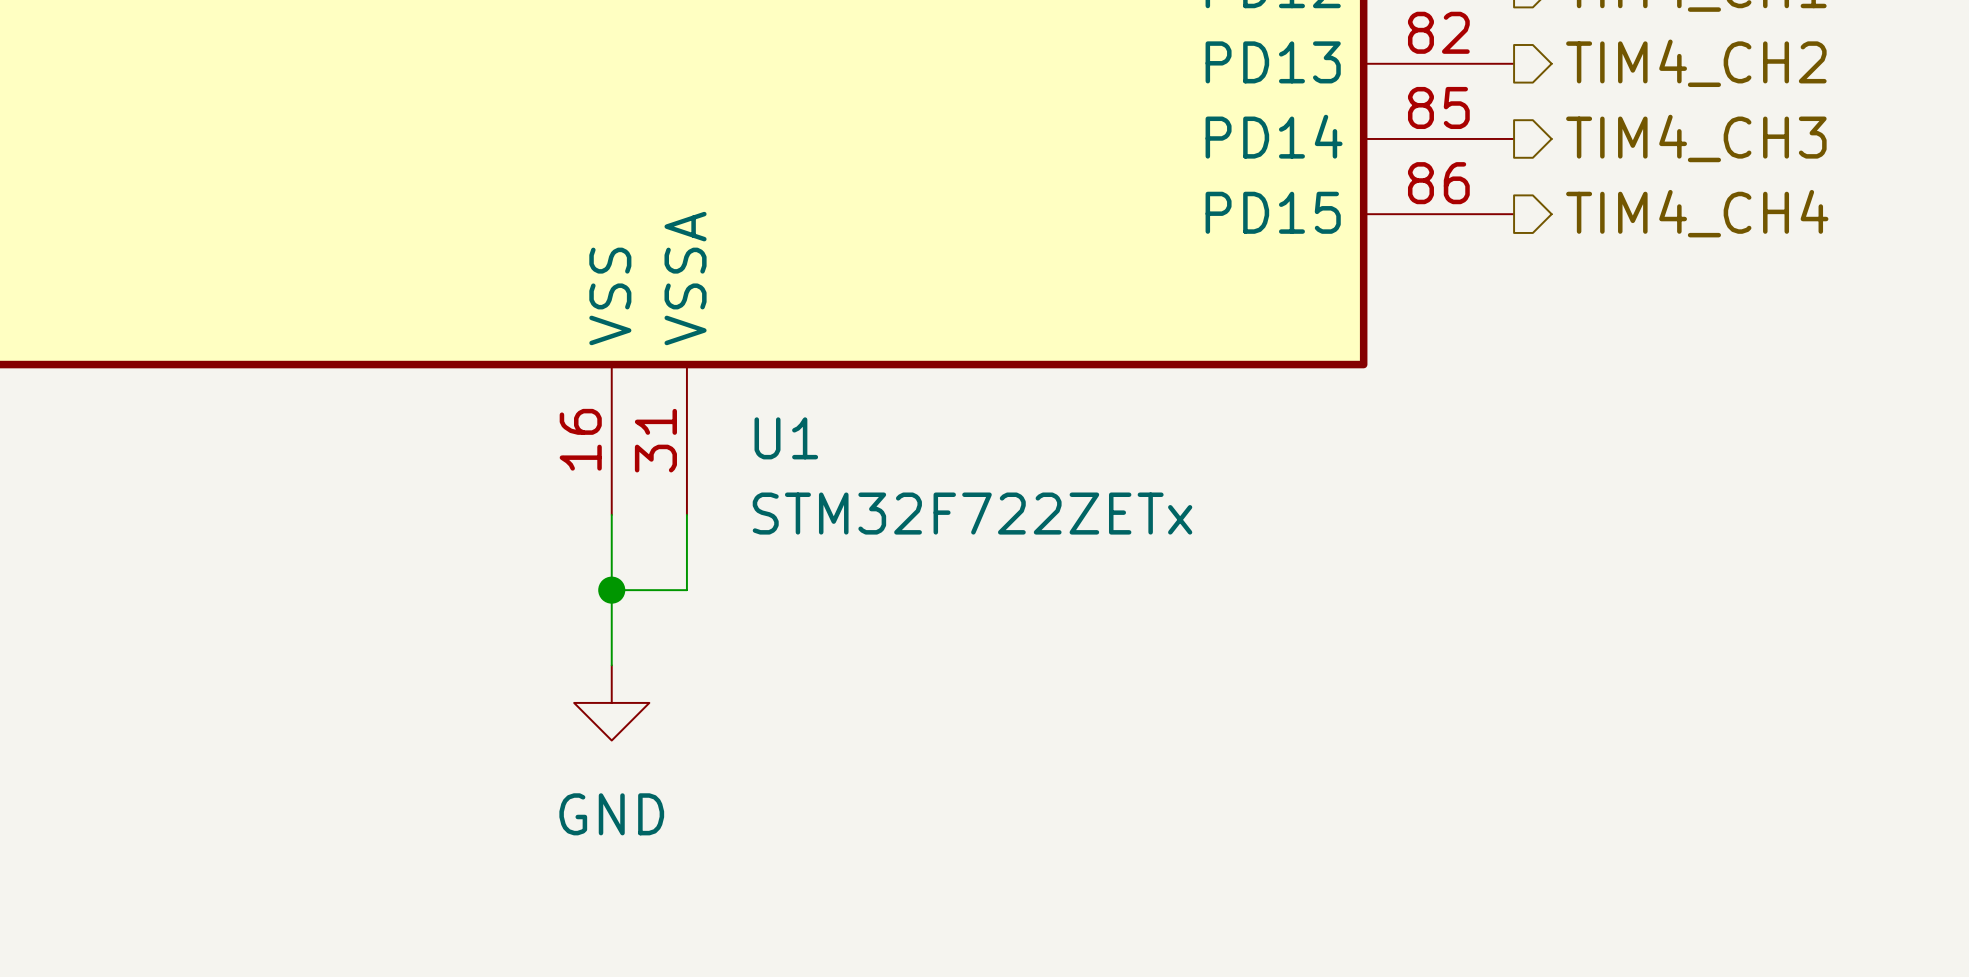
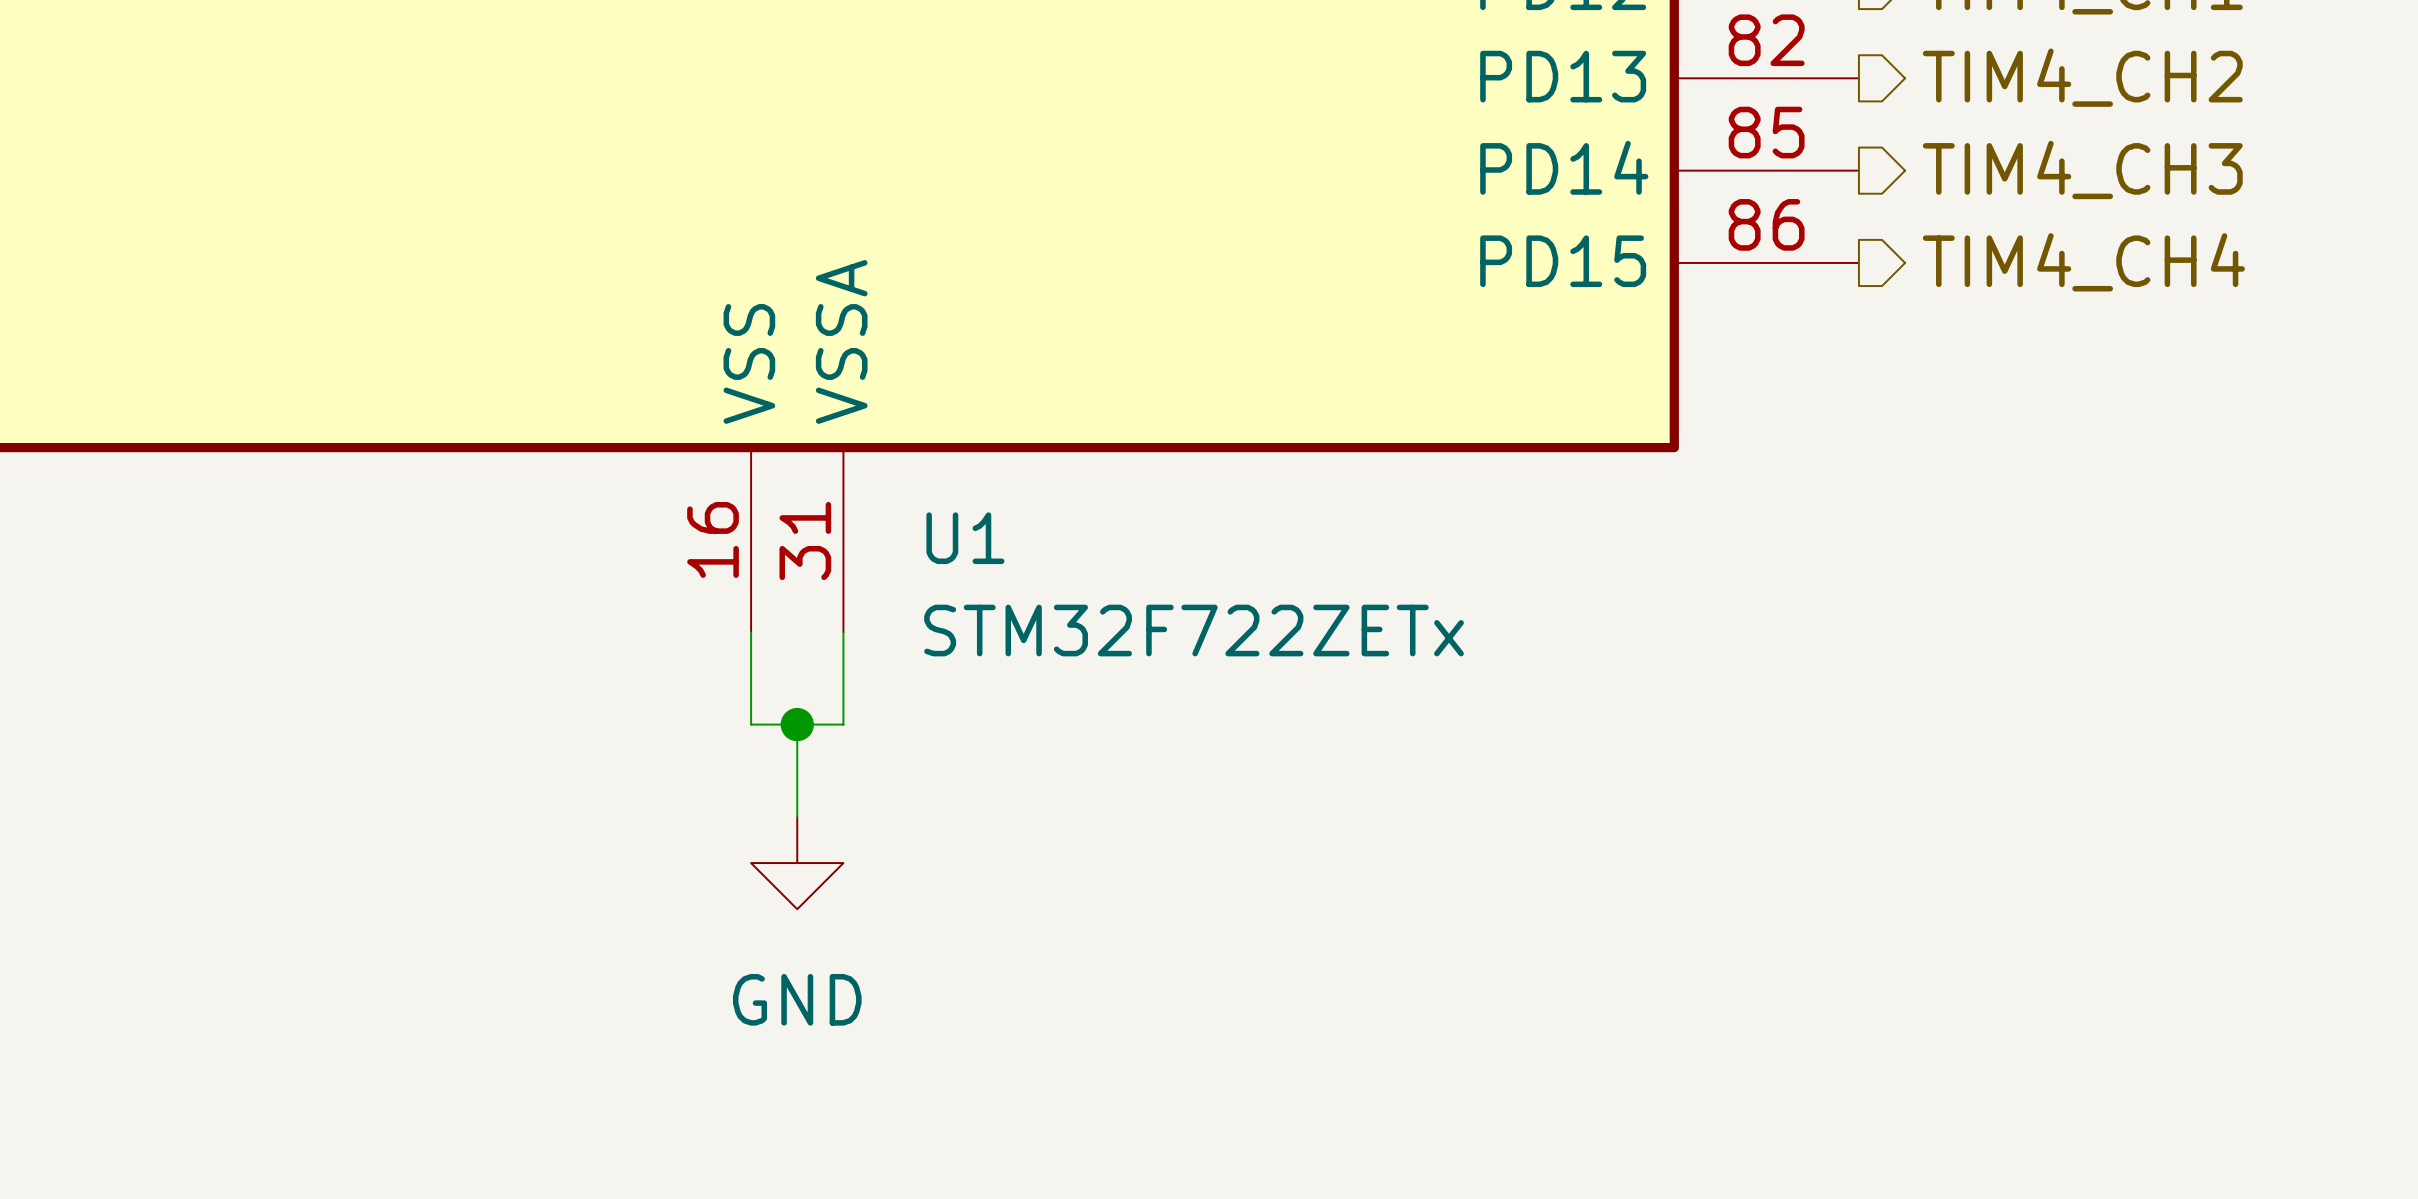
wire: (611, 590) (611, 665) -> (797, 724) (797, 816)
junction position: (611, 590) -> (797, 724)
power symbol position: GND (611, 702) -> GND (797, 863)

